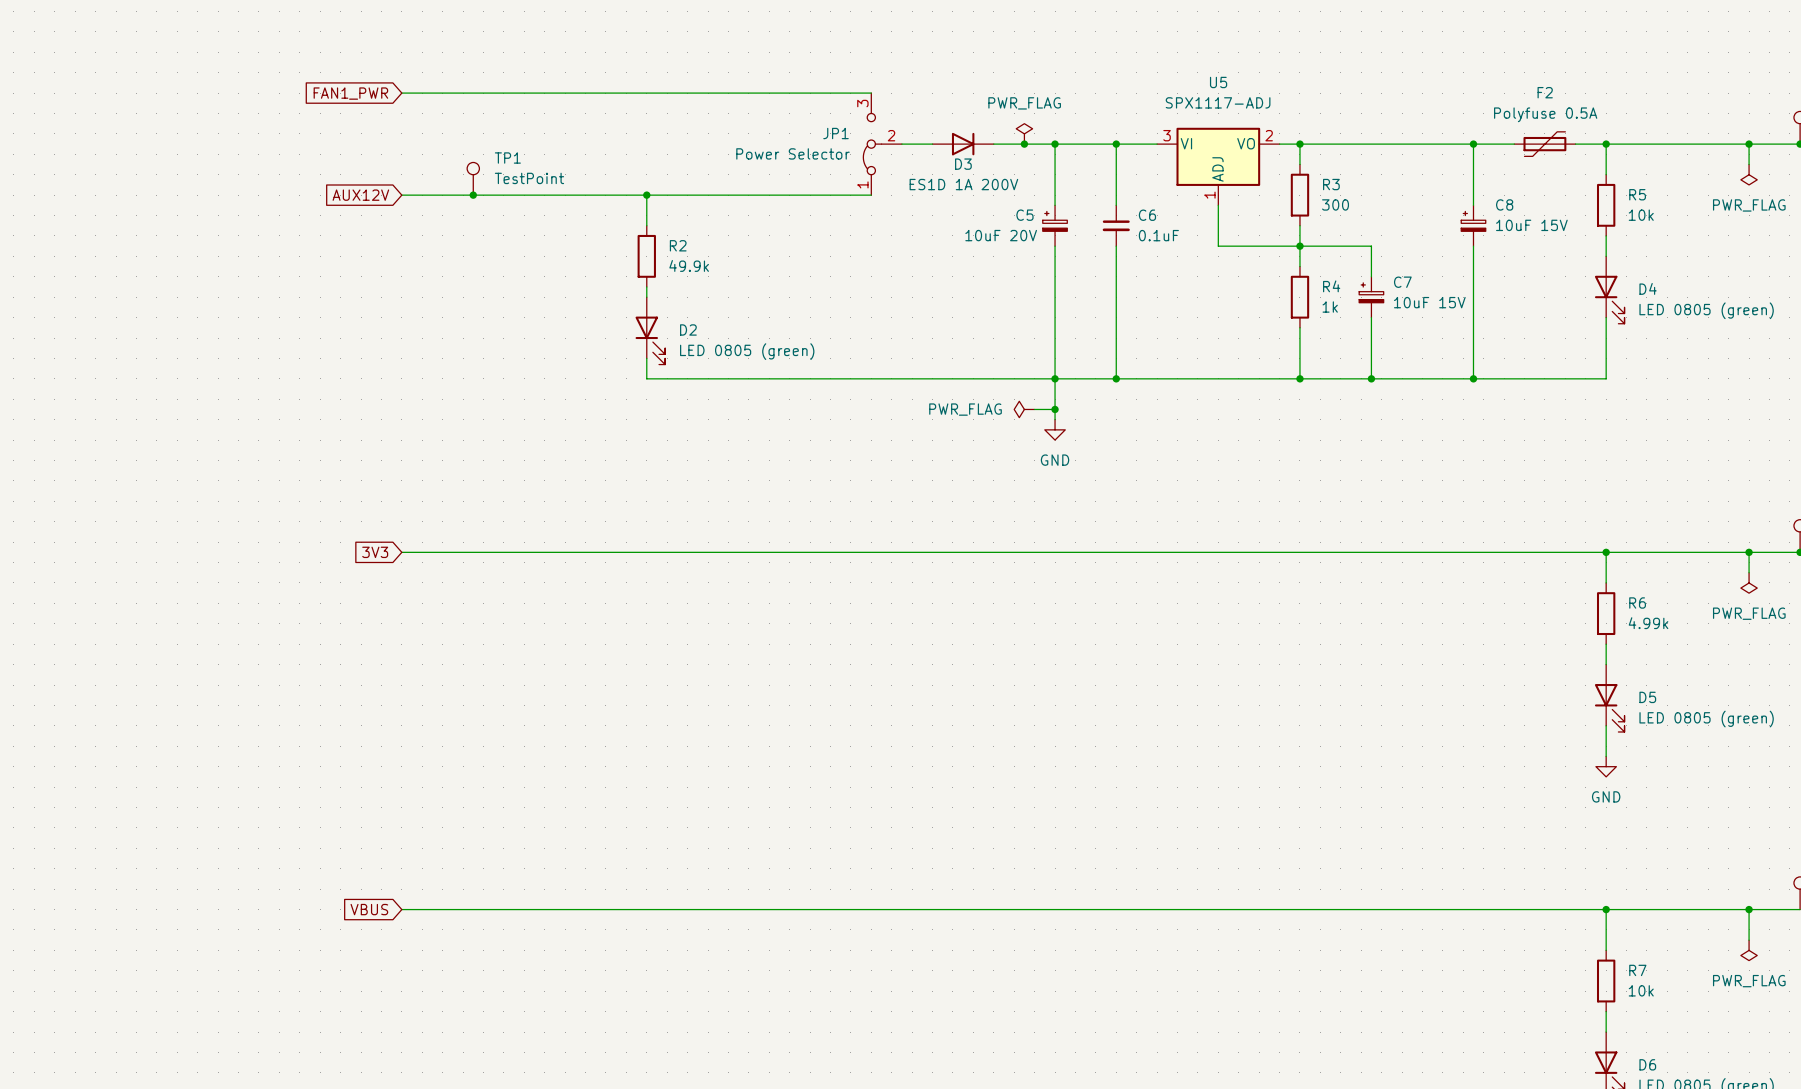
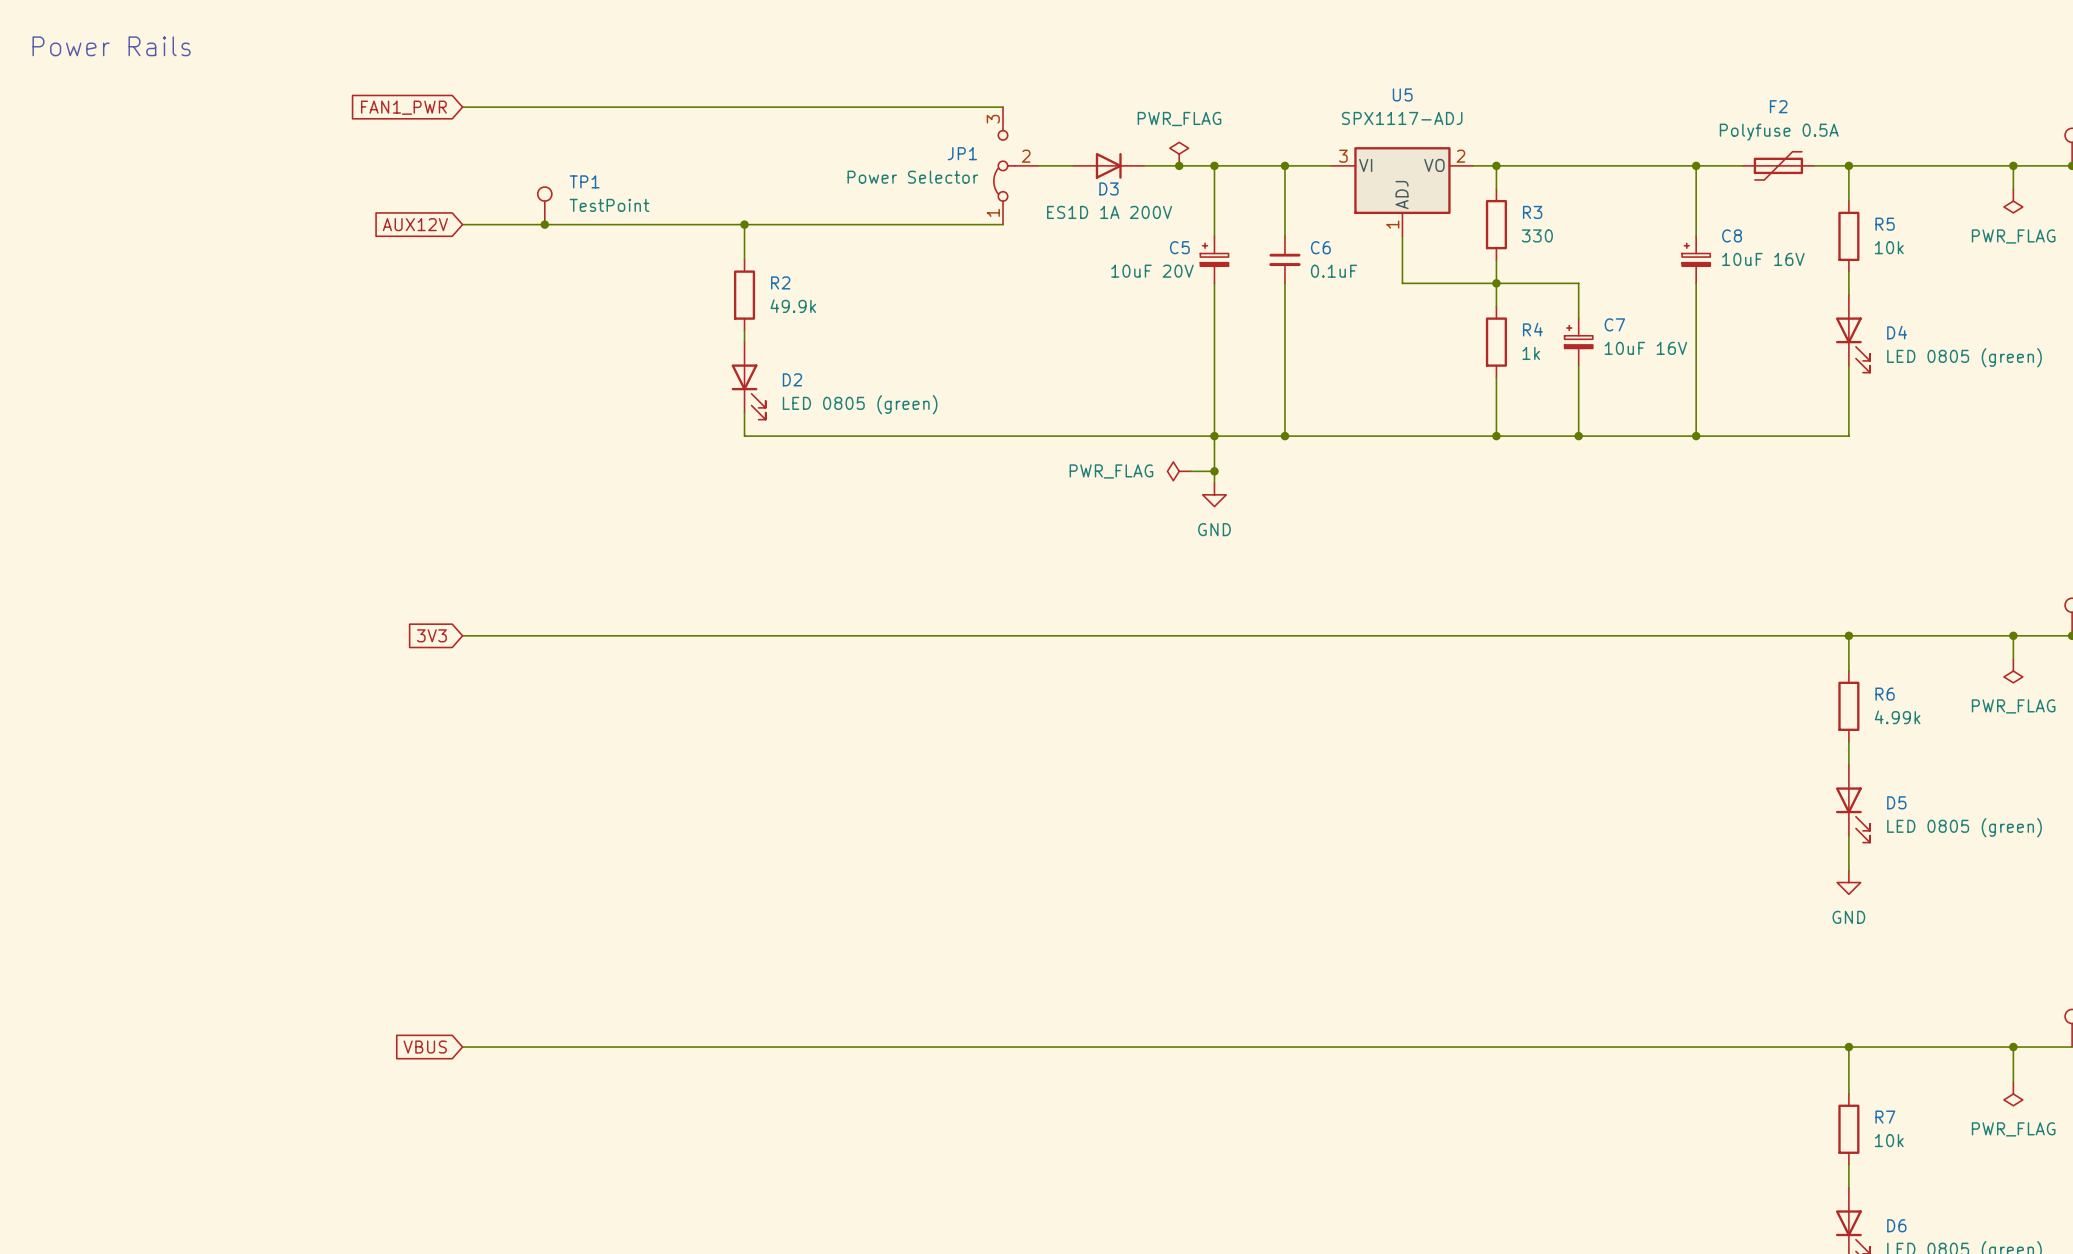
text: none -> Power Rails (111, 46)
R3 value: 300 (1335, 204) -> 330 (1537, 235)
C8 value: 10uF 15V (1531, 225) -> 10uF 16V (1763, 259)
C7 value: 10uF 15V (1429, 302) -> 10uF 16V (1645, 348)

